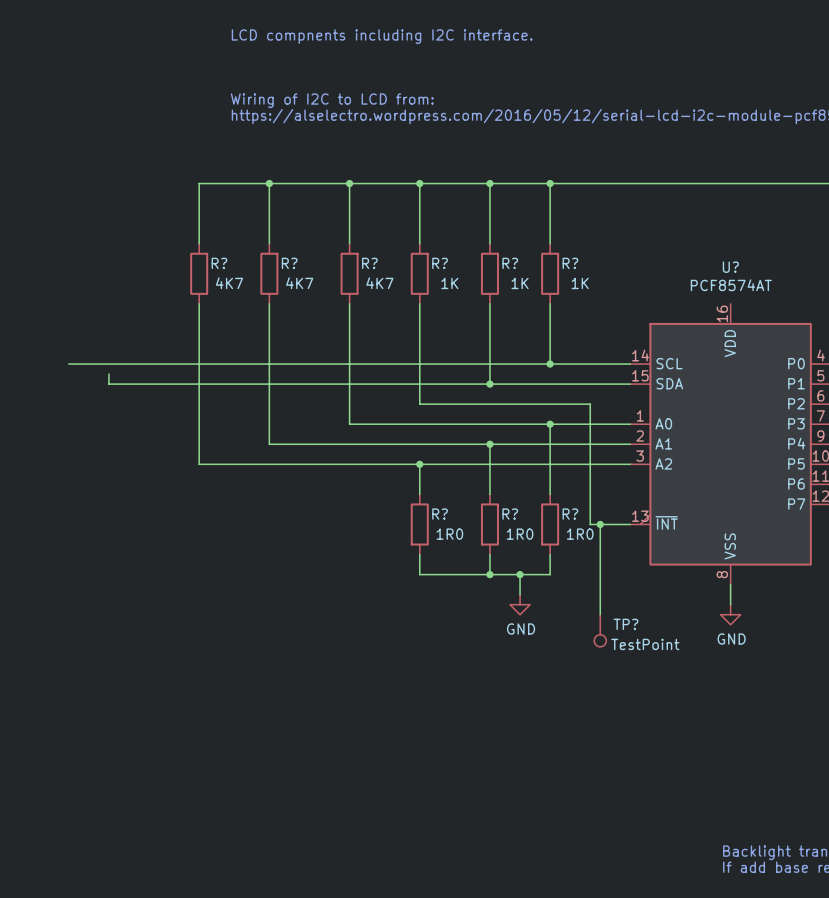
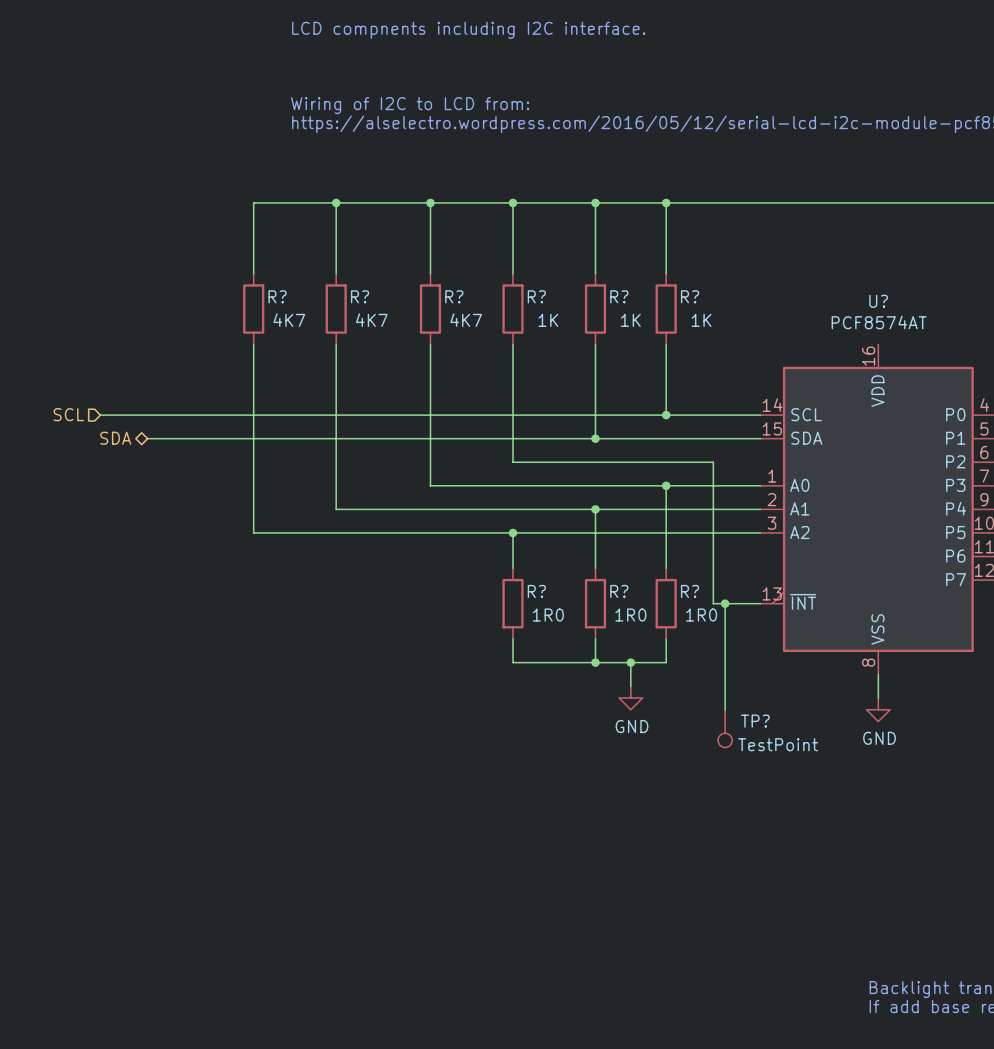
hierarchical label: none -> SCL (68, 414)
wire: (108, 374) (108, 384) -> none
hierarchical label: none -> SDA (115, 438)

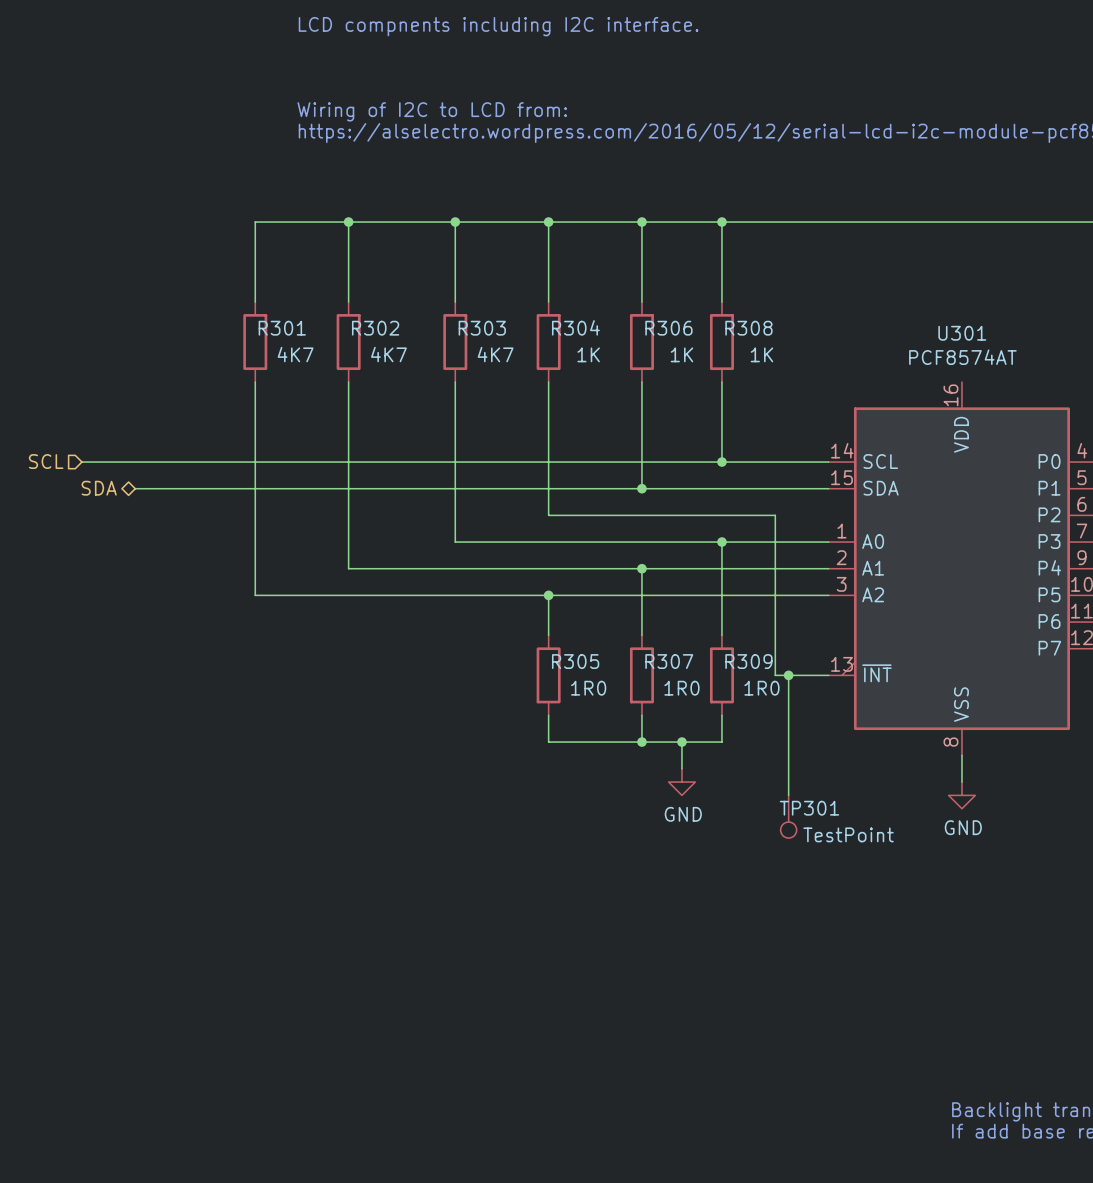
R? name: R? (277, 296) -> R301 (282, 328)
R? name: R? (360, 296) -> R302 (375, 328)
R? name: R? (454, 296) -> R303 (482, 328)
R? name: R? (536, 296) -> R304 (575, 327)
R? name: R? (619, 296) -> R306 (668, 328)
R? name: R? (690, 296) -> R308 (748, 328)
U? name: U? (878, 301) -> U301 (962, 333)
R? name: R? (536, 591) -> R305 (575, 661)
R? name: R? (619, 591) -> R307 (669, 661)
R? name: R? (690, 591) -> R309 (748, 661)
TP? name: TP? (755, 721) -> TP301 (809, 808)

